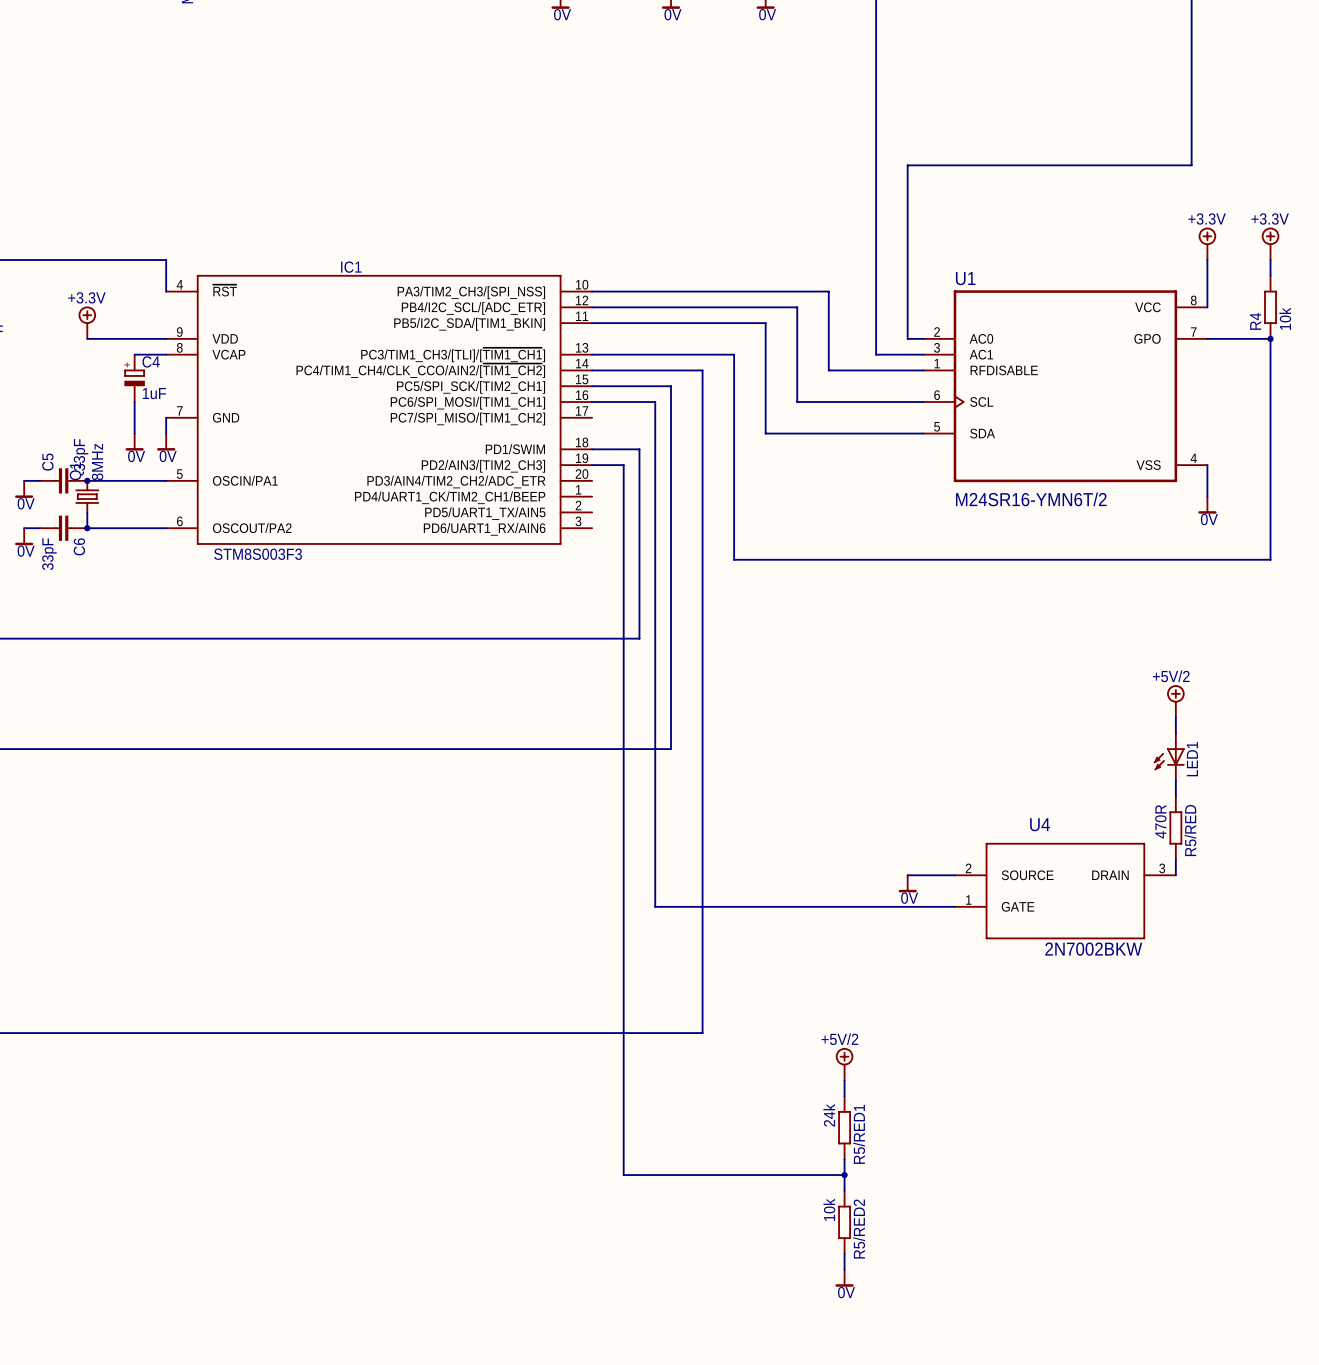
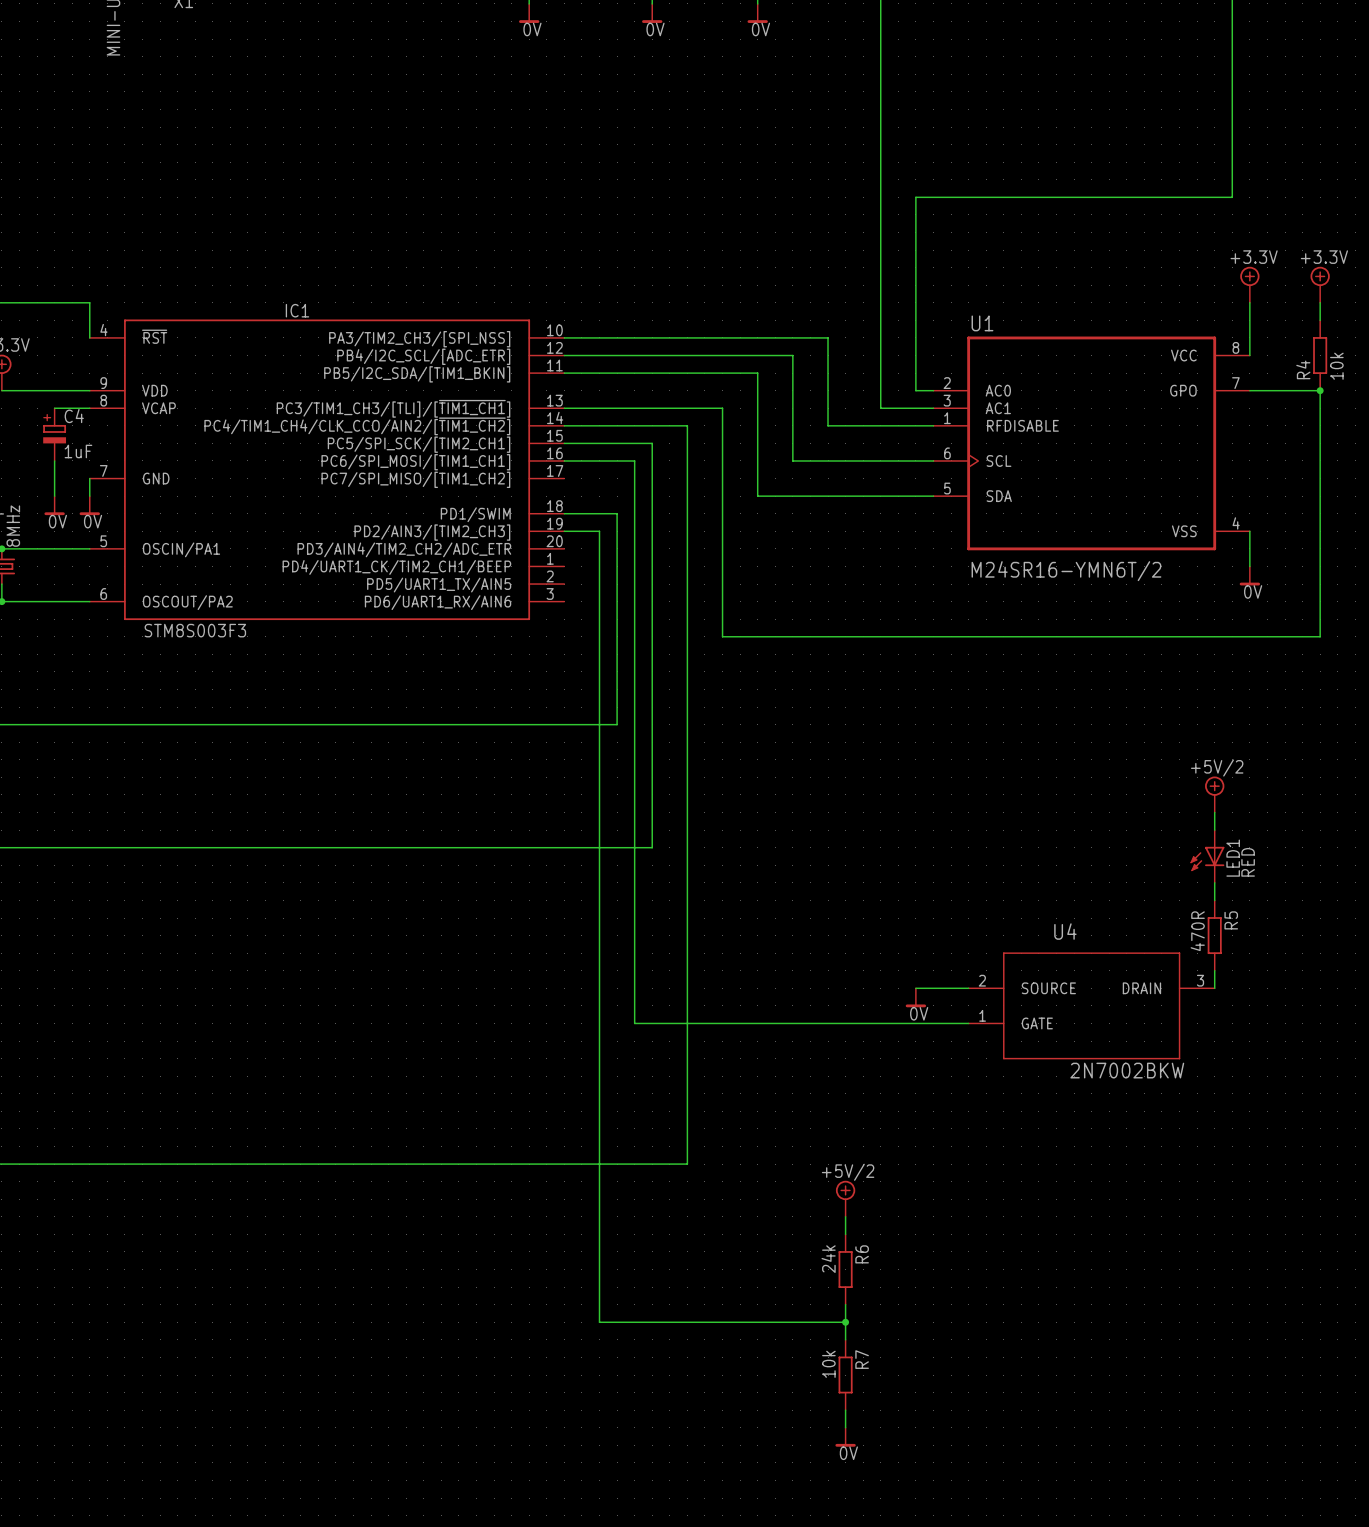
LED1 value: none -> RED (1248, 862)
R5/RED name: R5/RED (1190, 830) -> R5 (1231, 920)
R5/RED1 name: R5/RED1 (859, 1134) -> R6 (862, 1254)
R5/RED2 name: R5/RED2 (859, 1228) -> R7 (862, 1359)

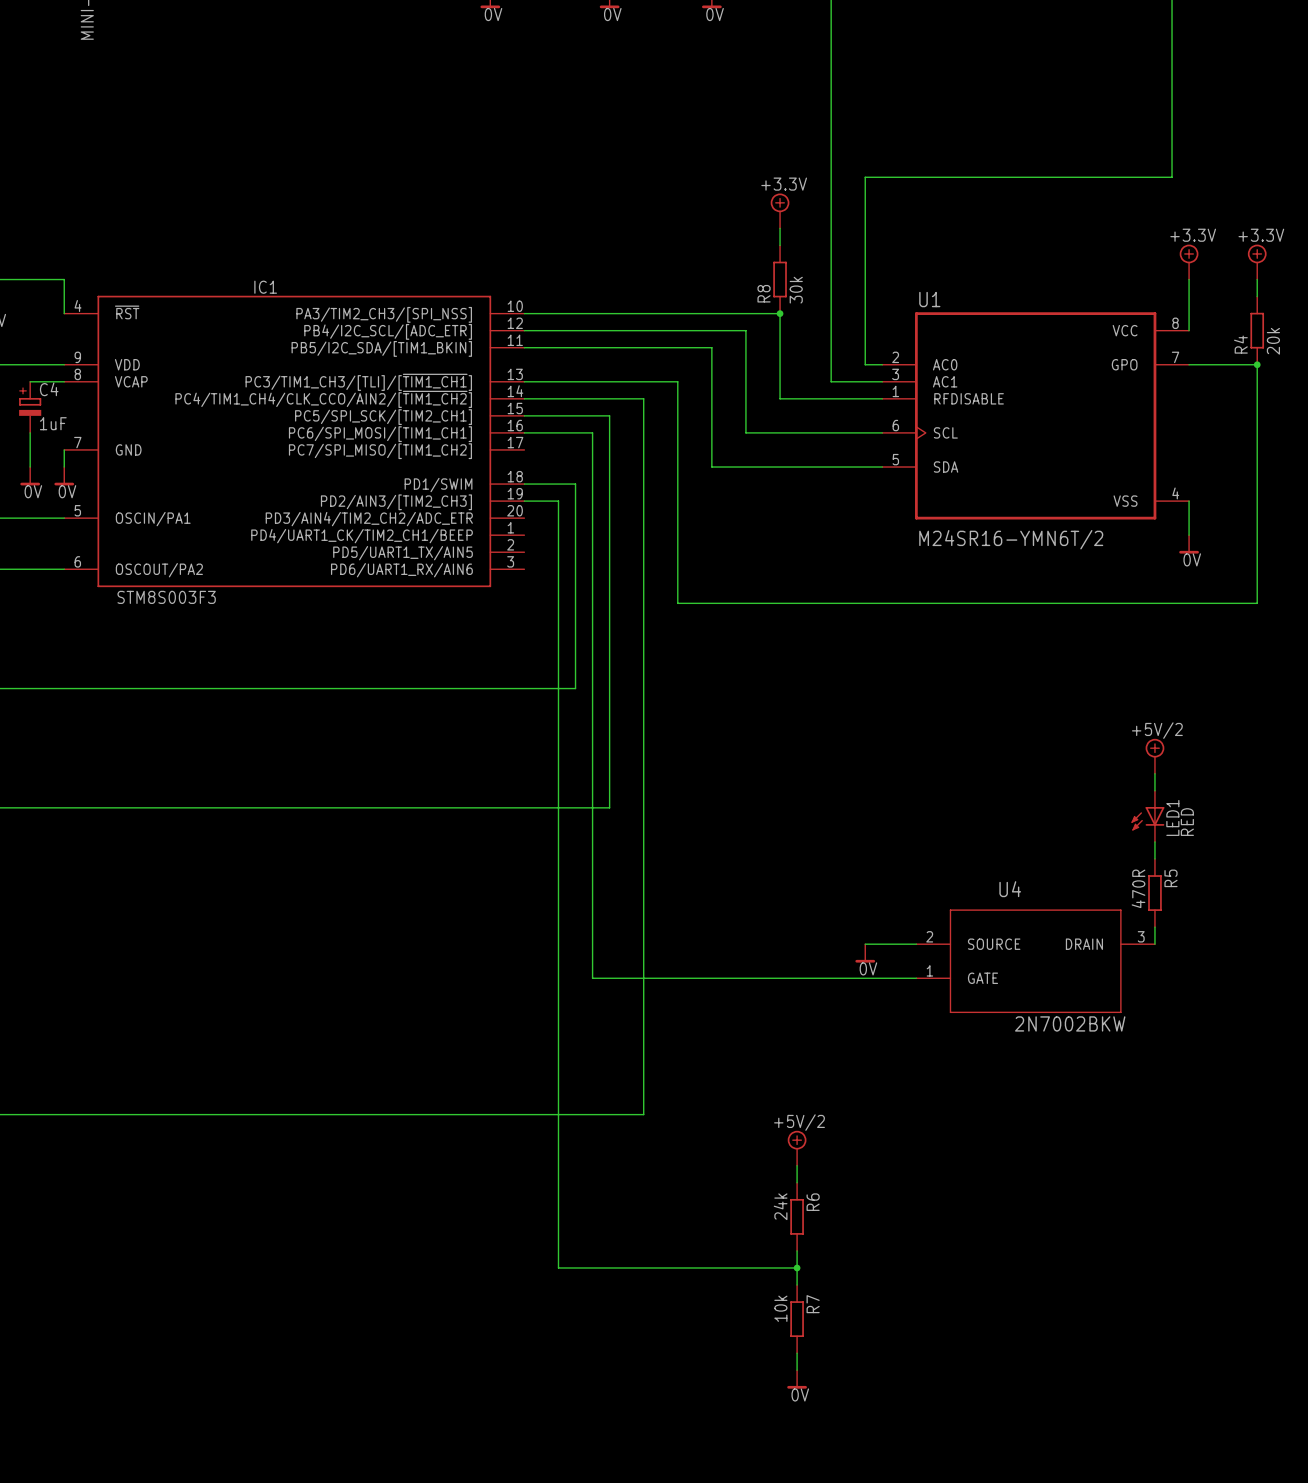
power symbol: none -> +3.3V (780, 210)
wire: none -> (780, 228) (780, 245)
R8: none -> 30k (780, 279)
junction: none -> (780, 313)
R4 value: 10k (1336, 366) -> 20k (1273, 341)

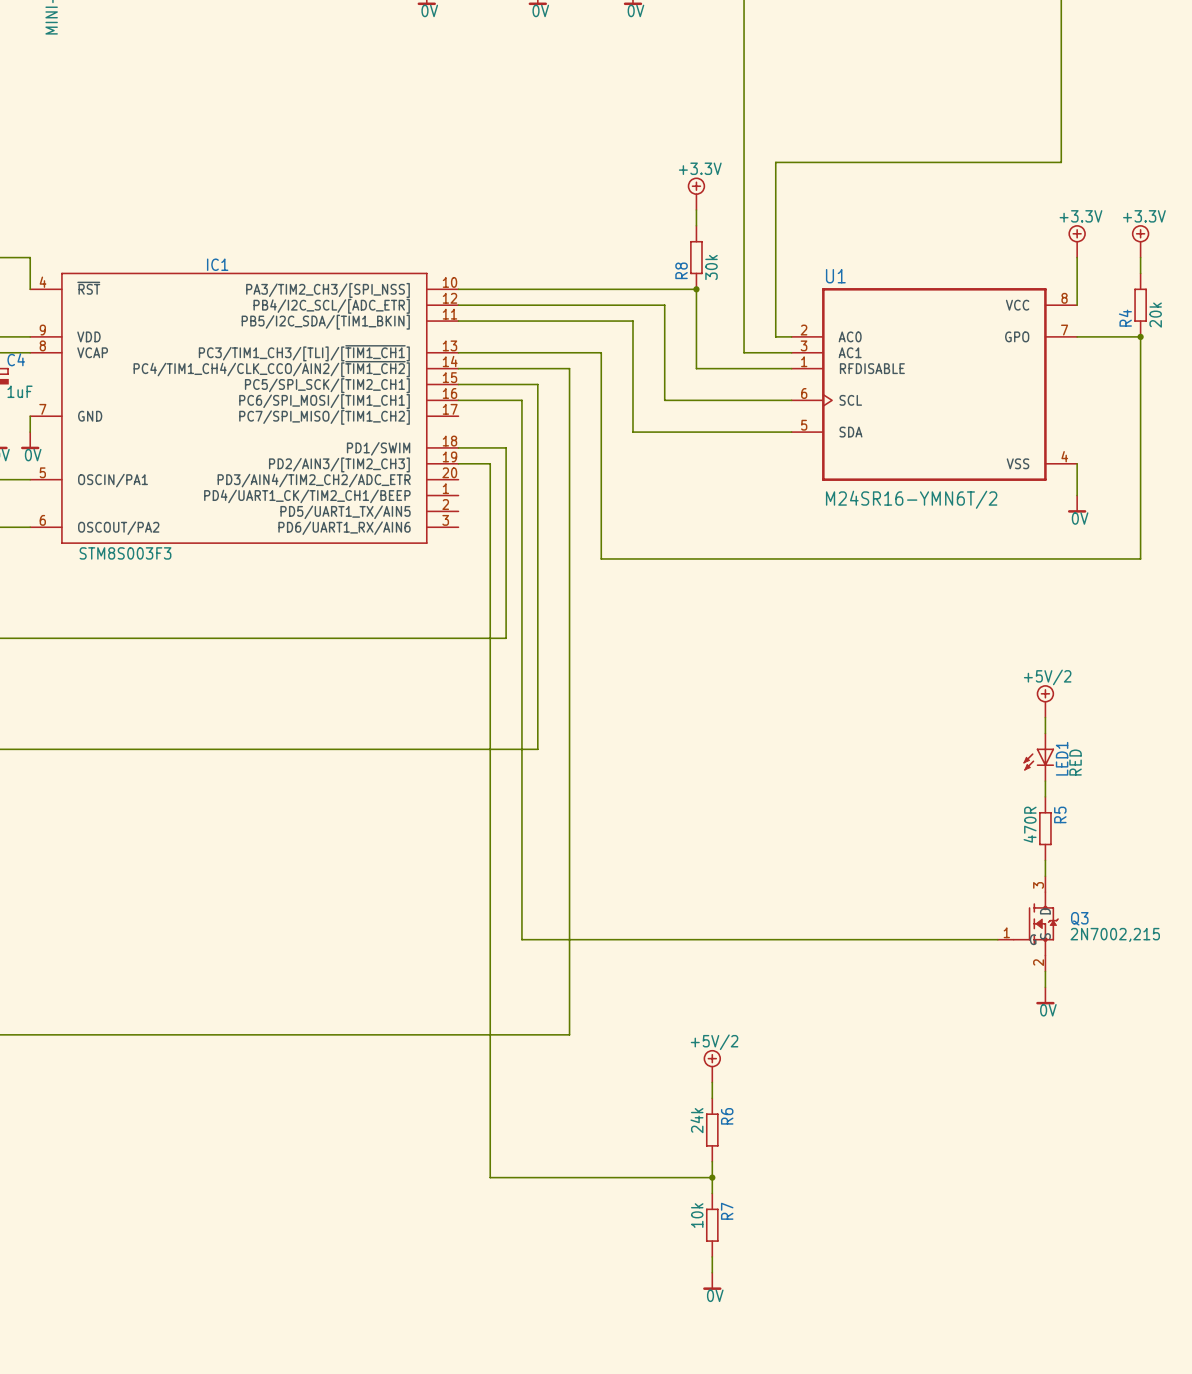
wire: (865, 944) (916, 944) -> none
power symbol: 0V (865, 953) -> none
U4: 2N7002BKW (1035, 961) -> none
wire: (592, 978) (916, 978) -> (521, 907) (521, 939) (997, 939)
Q3: none -> 2N7002,215 (1028, 923)
wire: none -> (1045, 971) (1045, 987)
power symbol: none -> 0V (1045, 995)

